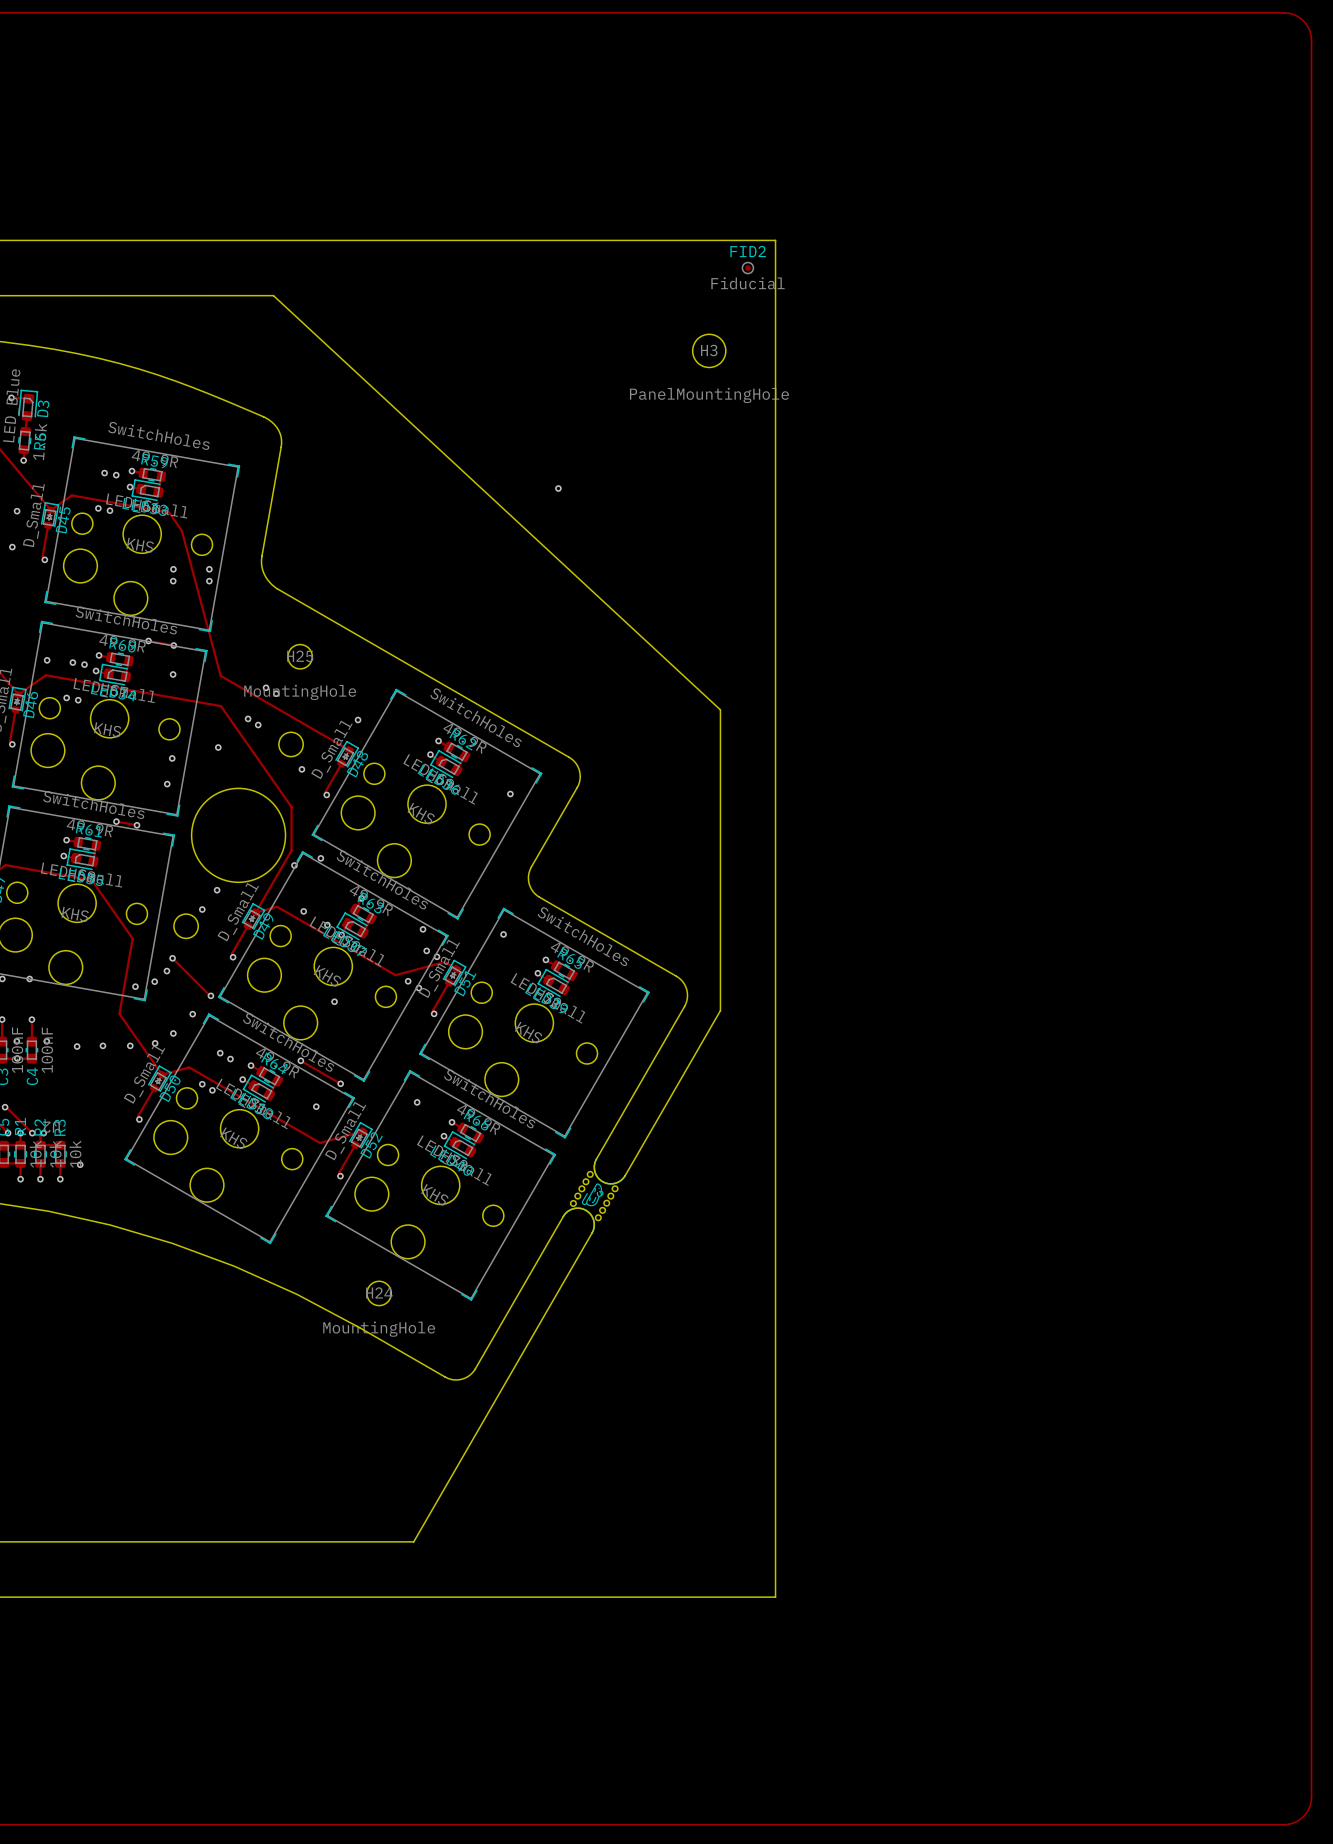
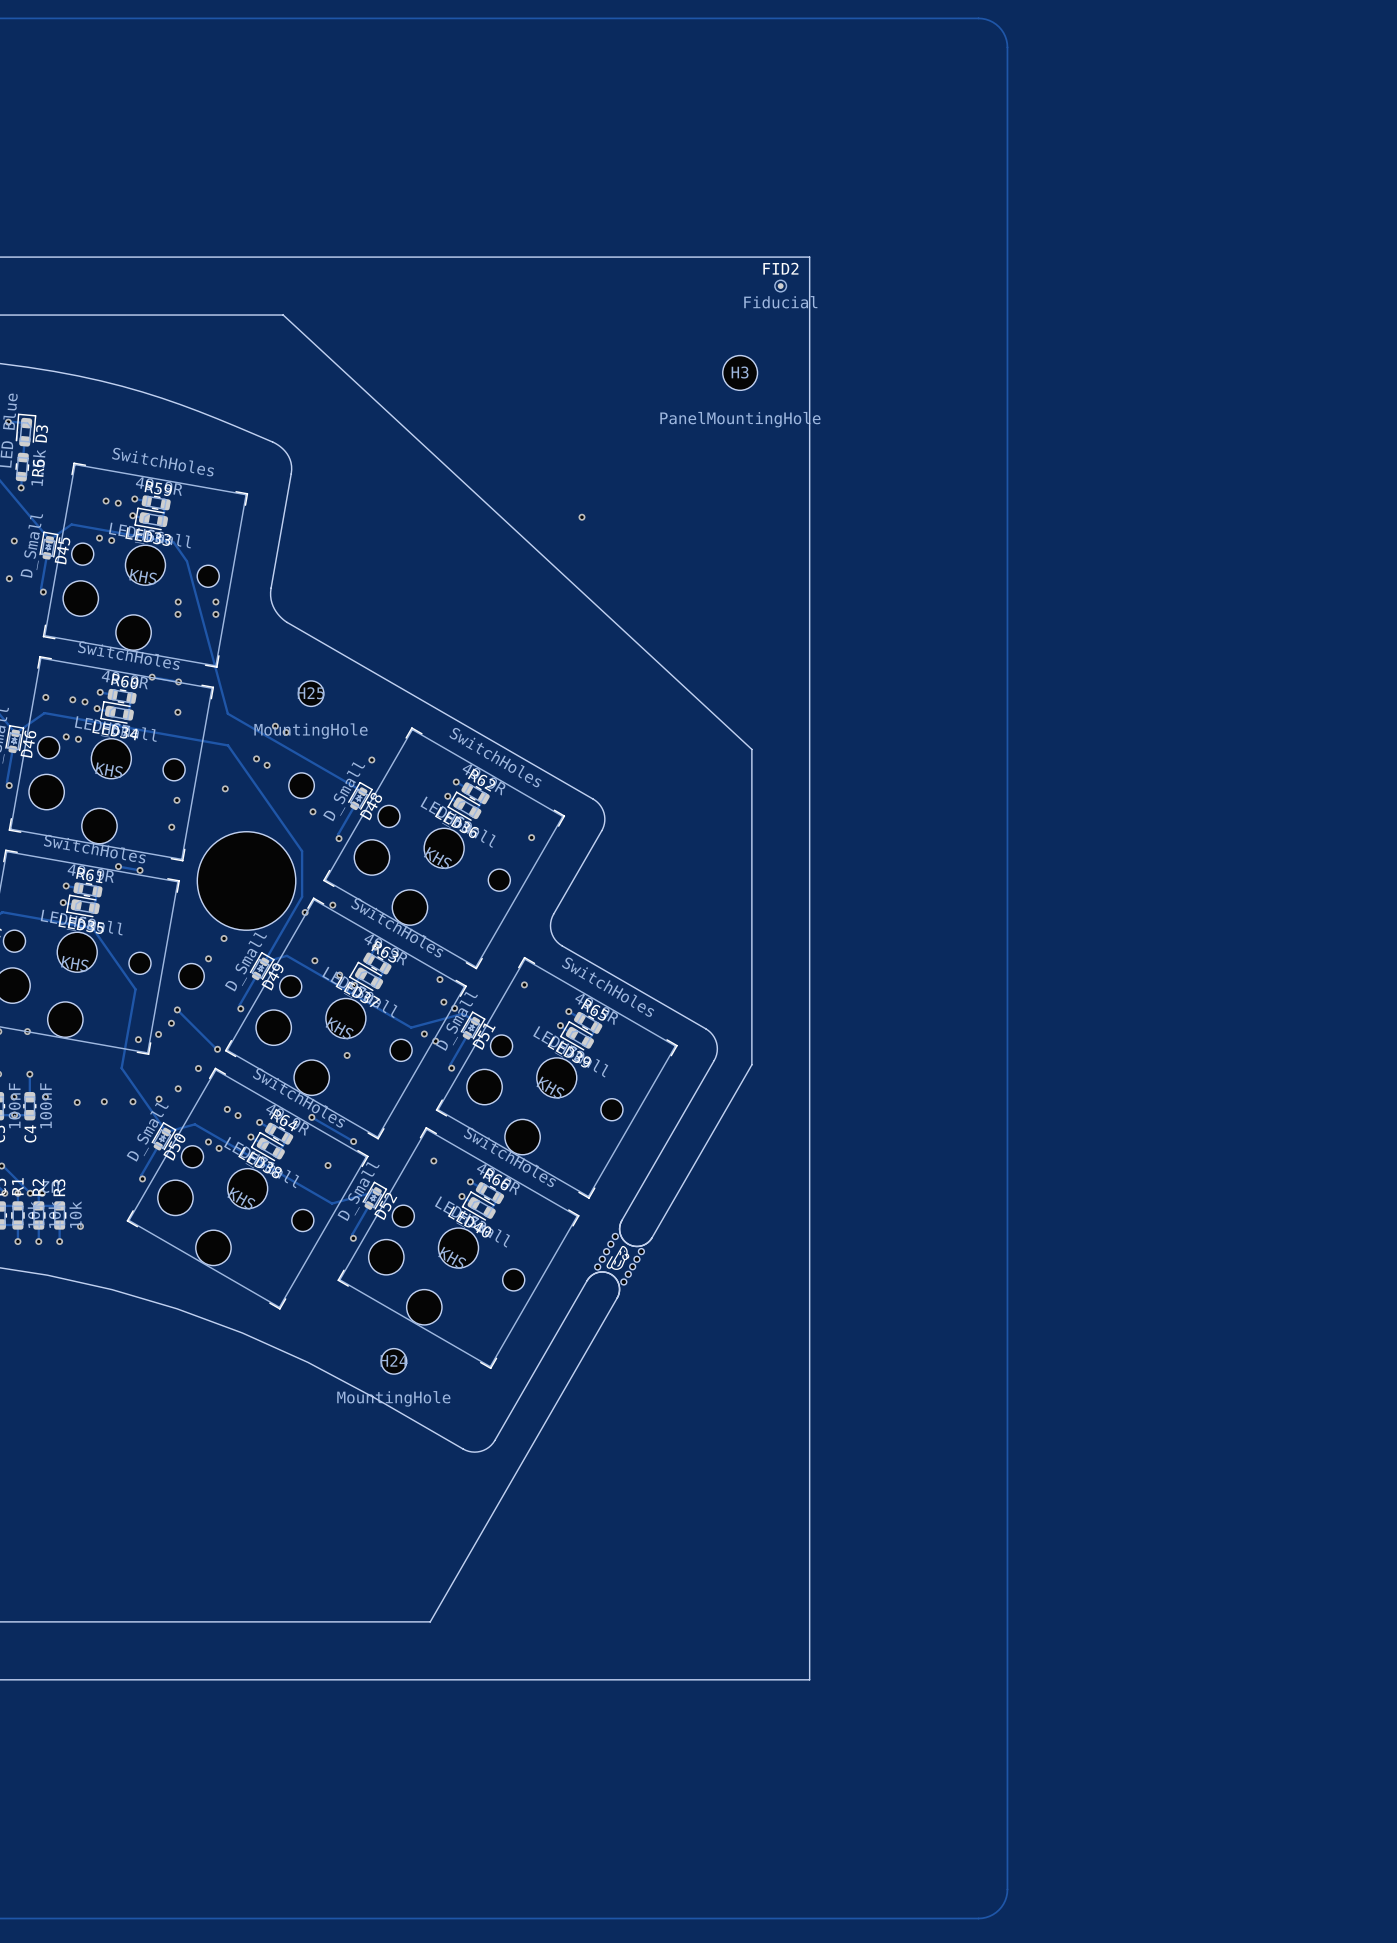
track: (936, 12) (1283, 12) (1294, 14) (1303, 20) (1311, 36) (1311, 1797) (1309, 1807) (1303, 1816) (1294, 1822) (1283, 1824) -> (978, 18) (989, 20) (998, 26) (1005, 36) (1007, 47) (1007, 1889) (1005, 1900) (998, 1910) (989, 1916) (978, 1918)
track: (936, 1824) (1283, 1824) -> none

